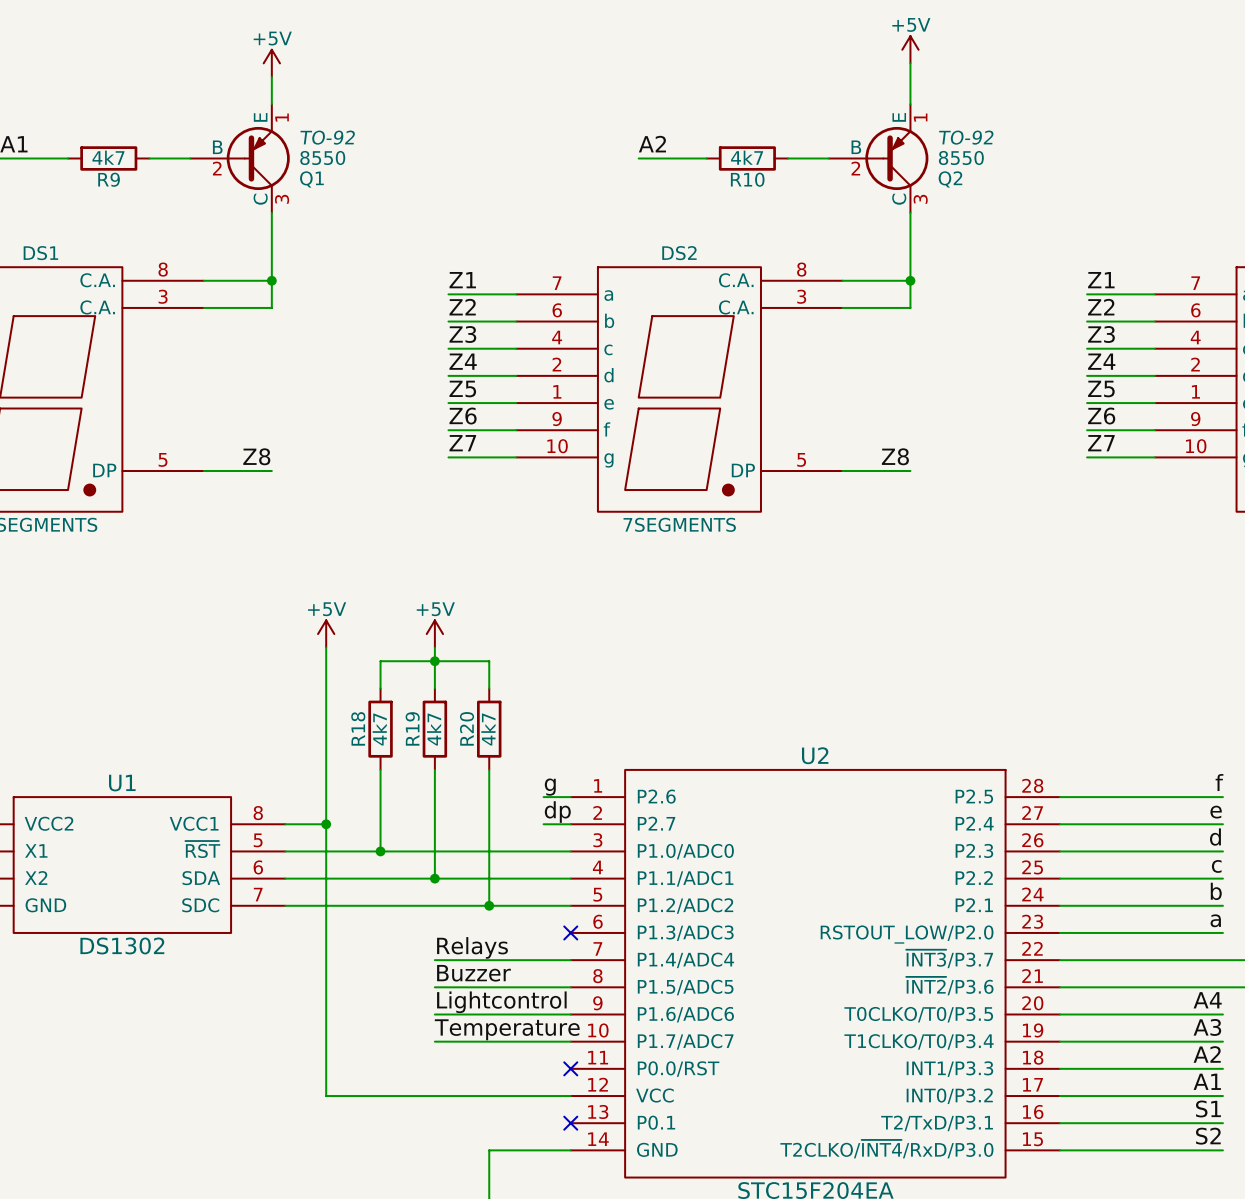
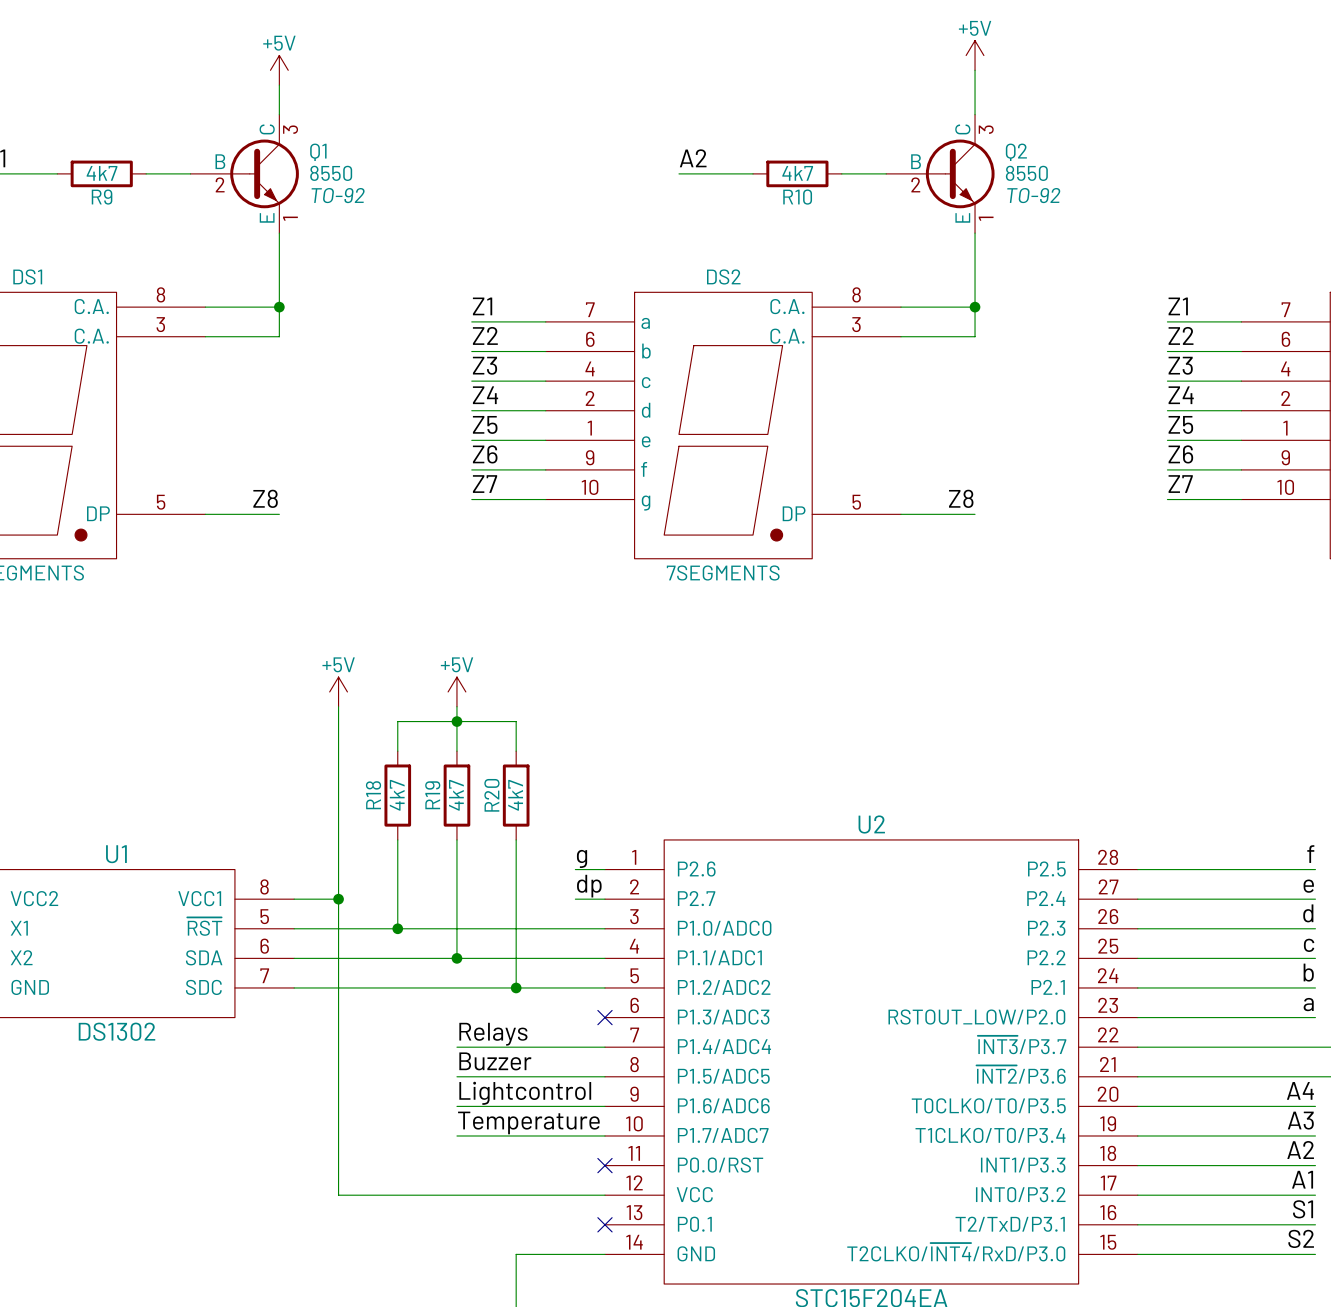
Q1 symbol: [190, 104, 290, 213] -> [190, 114, 299, 234]
Q2 symbol: [828, 104, 929, 213] -> [886, 114, 995, 234]
Q1 text position: TO-92 (327, 137) -> TO-92 (338, 195)
Q2 text position: TO-92 (966, 137) -> TO-92 (1033, 195)
Q1 name position: Q1 (311, 179) -> Q1 (318, 152)
Q2 name position: Q2 (950, 179) -> Q2 (1016, 152)

